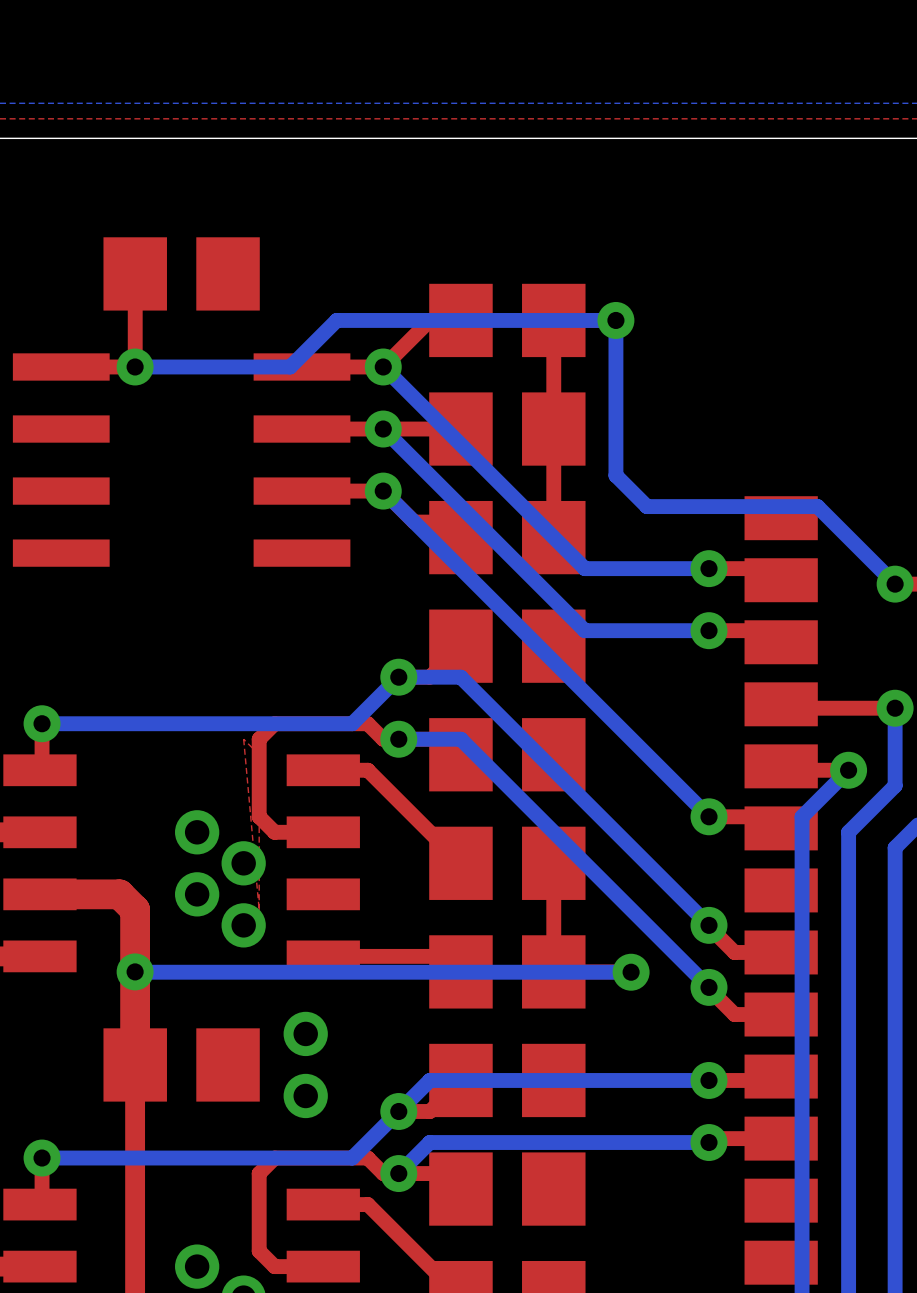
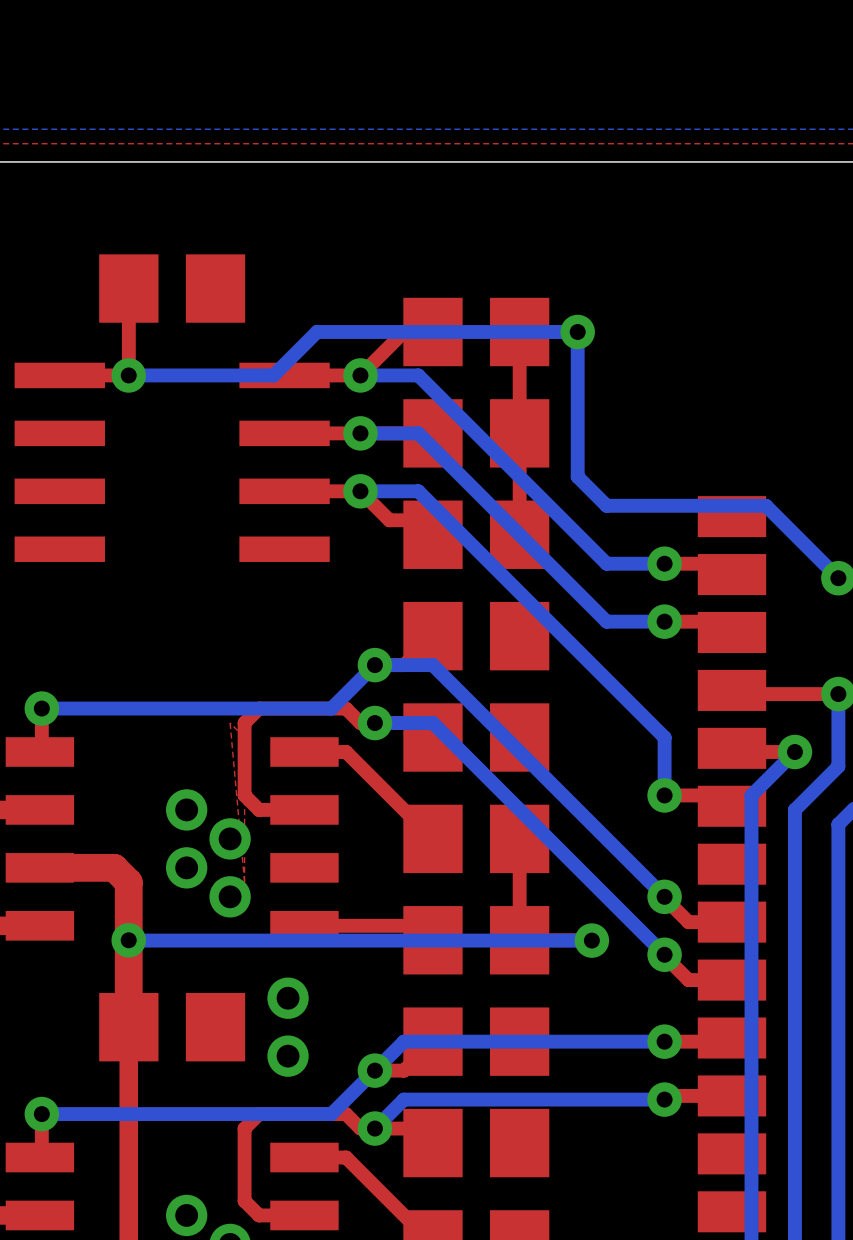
bottom track: (383, 366) (445, 429) -> (360, 433) (418, 433)
bottom track: none -> (360, 375) (418, 375) (606, 563)
bottom track: (383, 429) (445, 491) -> (360, 491) (418, 491)
bottom track: (383, 491) (709, 816) -> none
bottom track: (646, 568) (584, 568) -> (606, 621) (548, 563)
bottom track: (646, 630) (584, 630) -> (664, 795) (664, 737) (548, 621)

